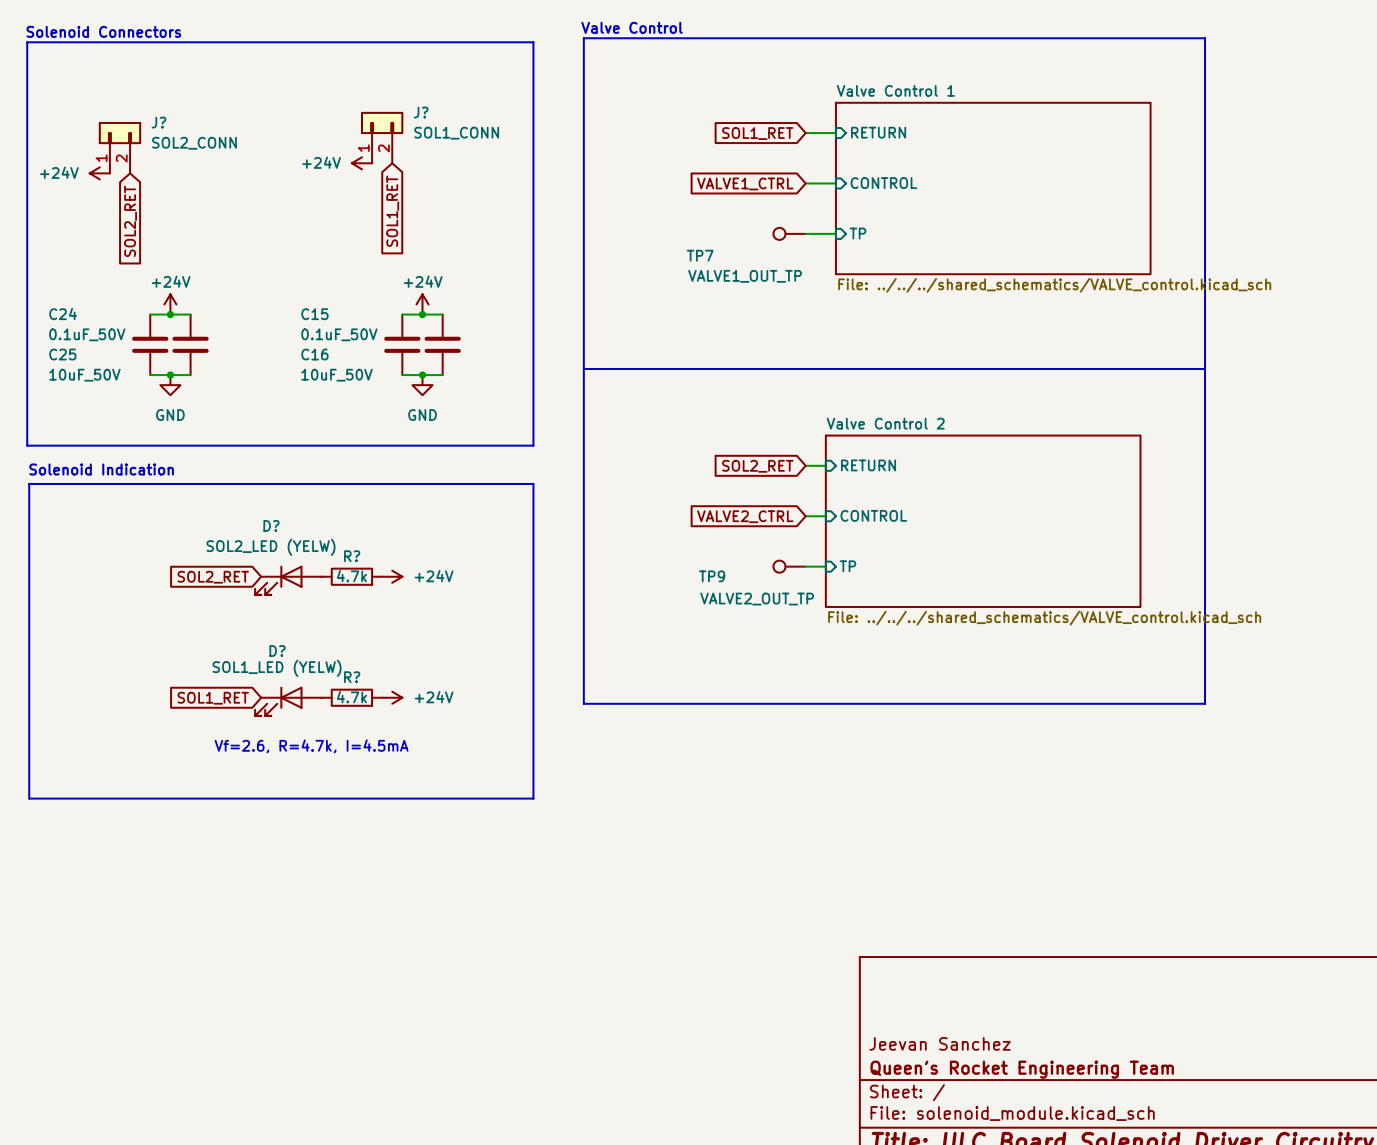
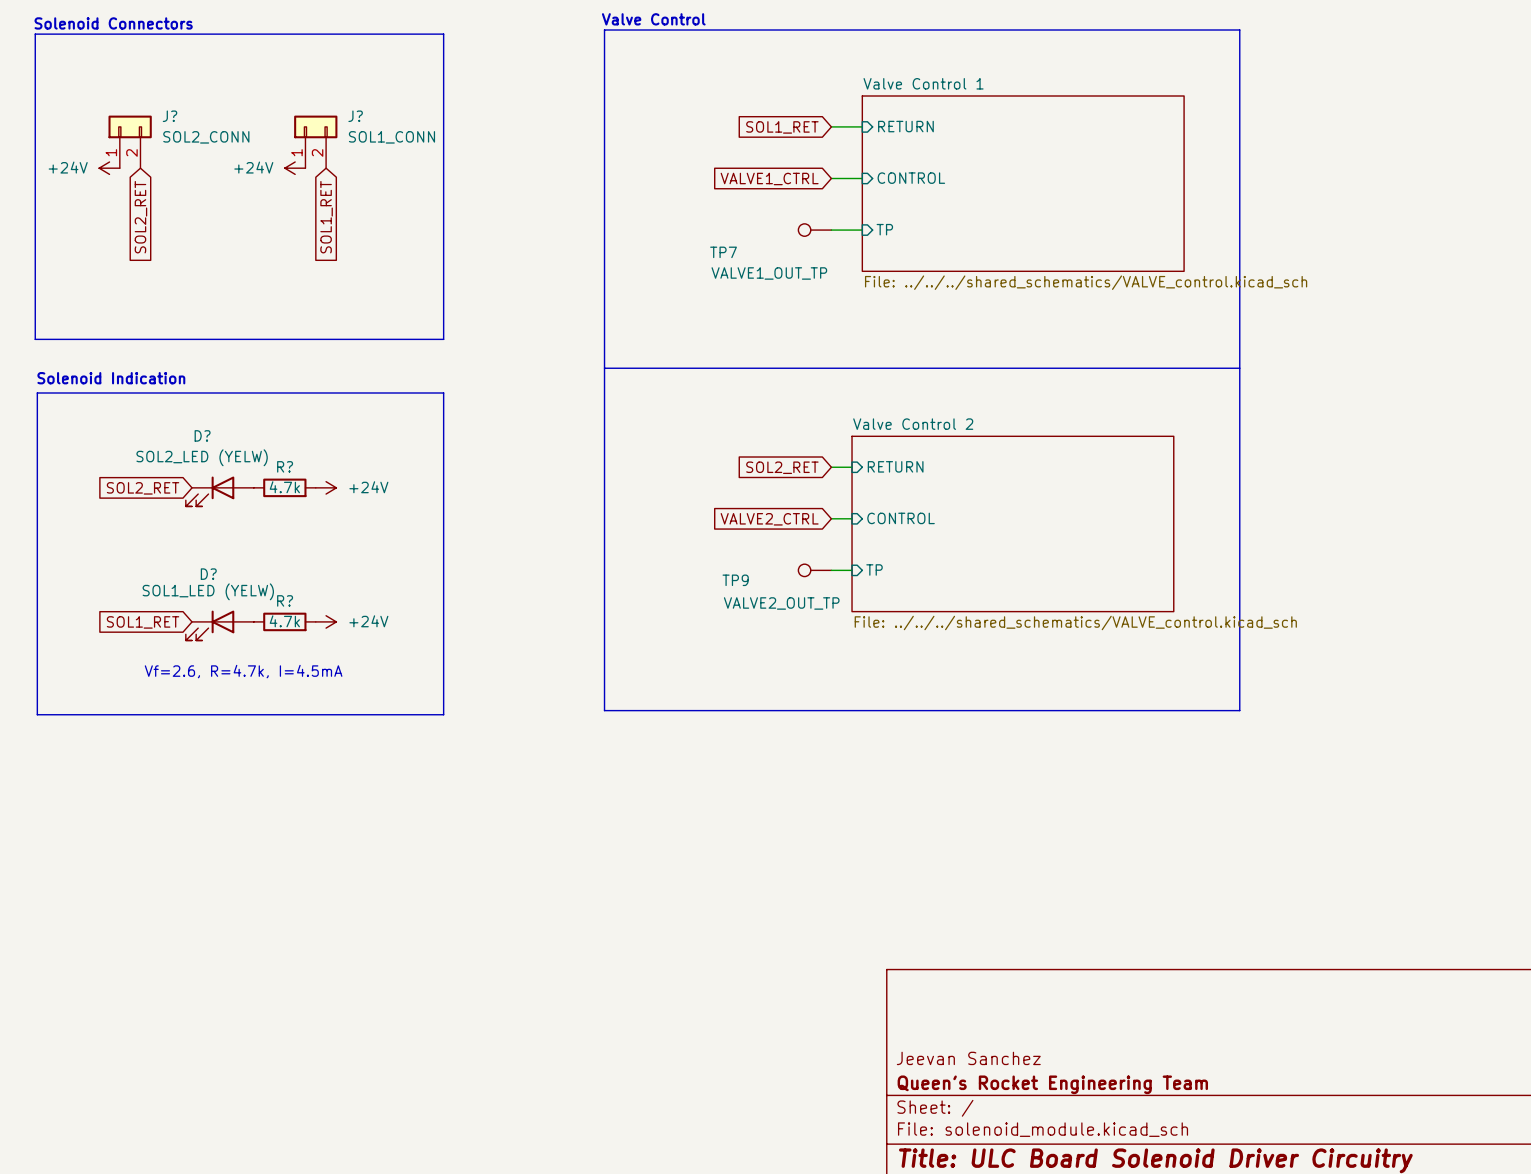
line: (426, 42) (533, 42) (533, 445) (27, 445) (27, 340) -> (443, 34) (443, 339) (35, 339)
J? position: (382, 137) -> (315, 141)
power symbol position: +24V (362, 163) -> +24V (295, 168)
global label position: SOL1_RET (392, 211) -> SOL1_RET (326, 217)
power symbol: +24V (170, 304) -> none
power symbol: +24V (422, 304) -> none
wire: (150, 314) (190, 314) -> none
junction: (170, 314) -> none
wire: (402, 314) (442, 314) -> none
junction: (422, 314) -> none
C24: 0.1uF_50V (150, 344) -> none
C25: 10uF_50V (190, 344) -> none
C15: 0.1uF_50V (402, 344) -> none
C16: 10uF_50V (442, 344) -> none
wire: (150, 375) (190, 375) -> none
junction: (170, 375) -> none
wire: (402, 375) (442, 375) -> none
junction: (422, 375) -> none
power symbol: GND (170, 385) -> none
power symbol: GND (422, 385) -> none
text position: Solenoid Indication (101, 469) -> Solenoid Indication (111, 378)
line: (29, 483) (533, 483) (533, 798) (29, 798) (29, 707) -> (37, 485) (37, 392) (443, 392) (443, 714) (37, 714)
R?: none -> 4.7k (284, 487)
power symbol: none -> +24V (326, 487)
R?: 4.7k (351, 576) -> none
power symbol: +24V (392, 576) -> none
global label position: SOL2_RET (213, 577) -> SOL2_RET (143, 488)
D? position: (288, 580) -> (219, 491)
R?: none -> 4.7k (284, 621)
power symbol: none -> +24V (326, 621)
R?: 4.7k (351, 697) -> none
power symbol: +24V (392, 697) -> none
global label position: SOL1_RET (213, 698) -> SOL1_RET (143, 622)
D? position: (288, 701) -> (219, 625)
text position: Vf=2.6, R=4.7k, I=4.5mA (311, 746) -> Vf=2.6, R=4.7k, I=4.5mA (243, 671)

